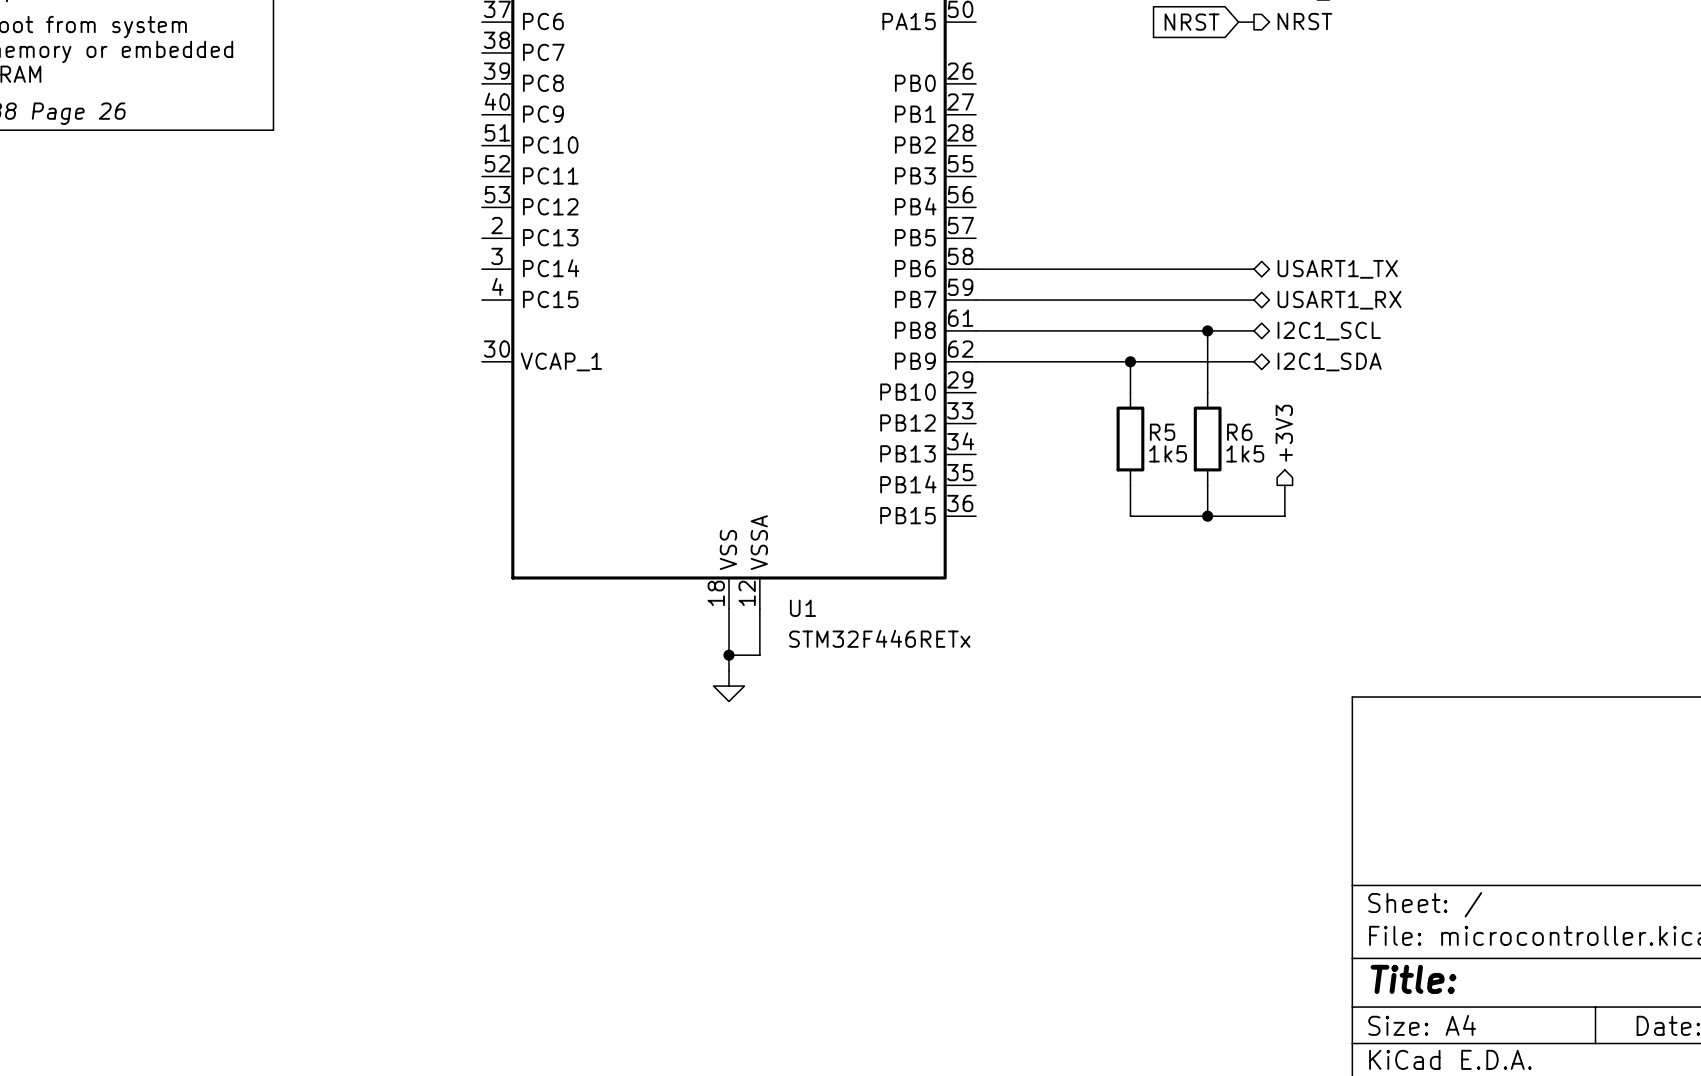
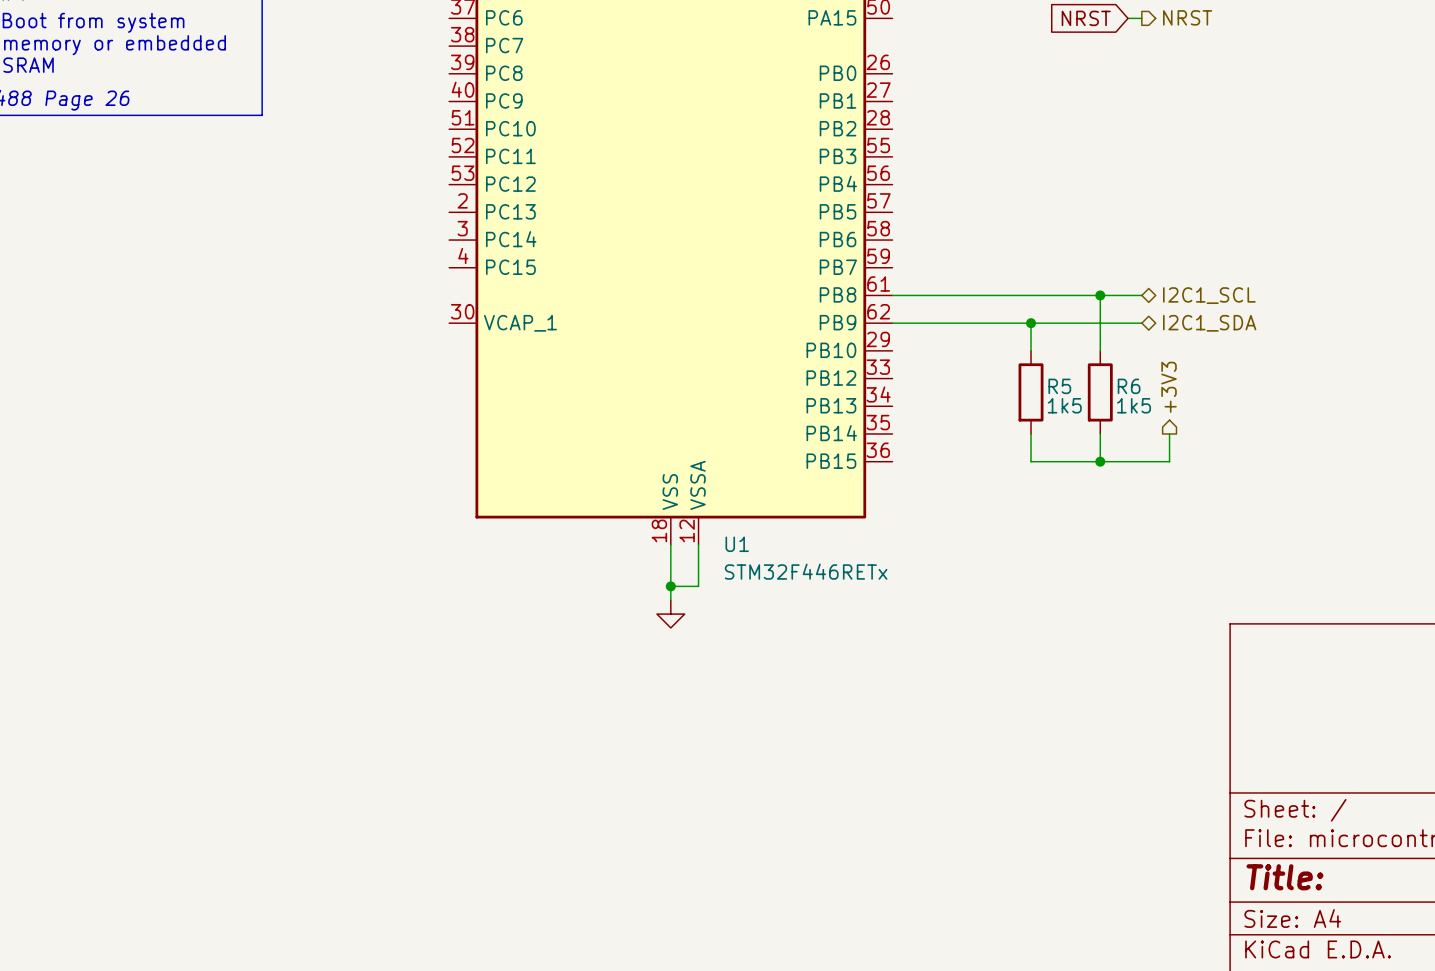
wire: (976, 269) (1253, 269) -> none
hierarchical label: USART1_TX (1337, 269) -> none
wire: (976, 300) (1253, 300) -> none
hierarchical label: USART1_RX (1339, 300) -> none

